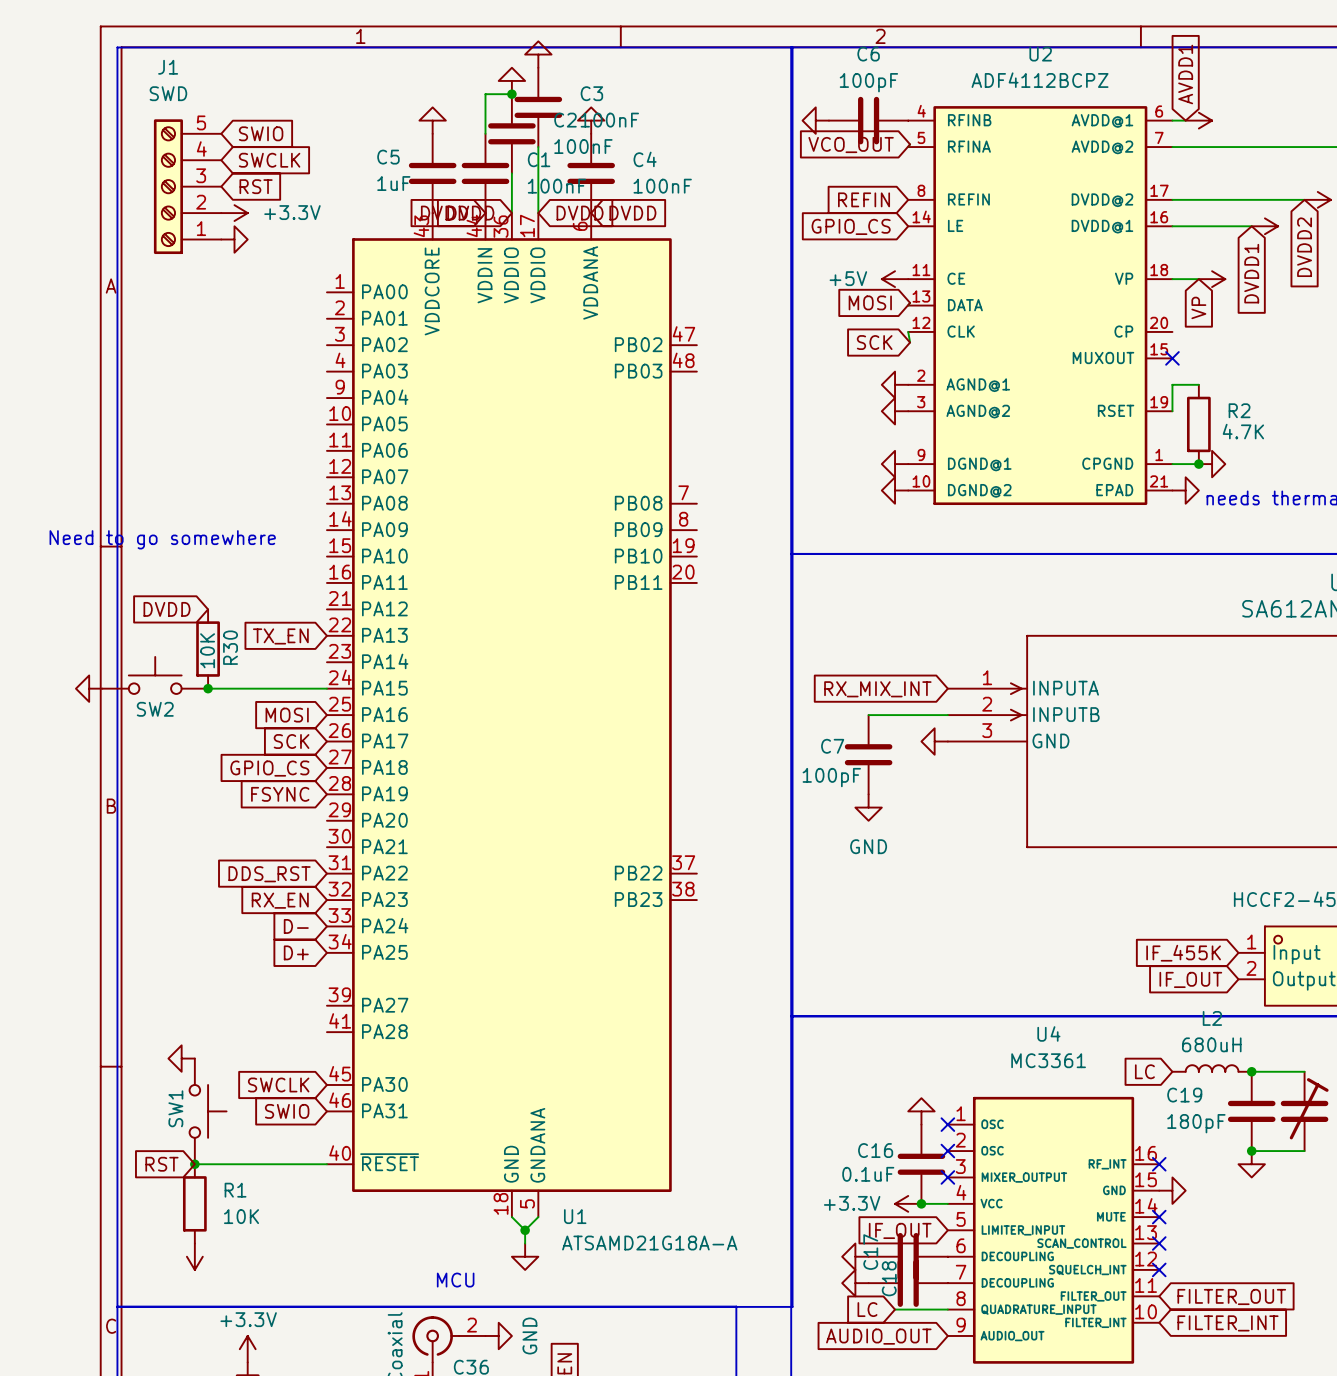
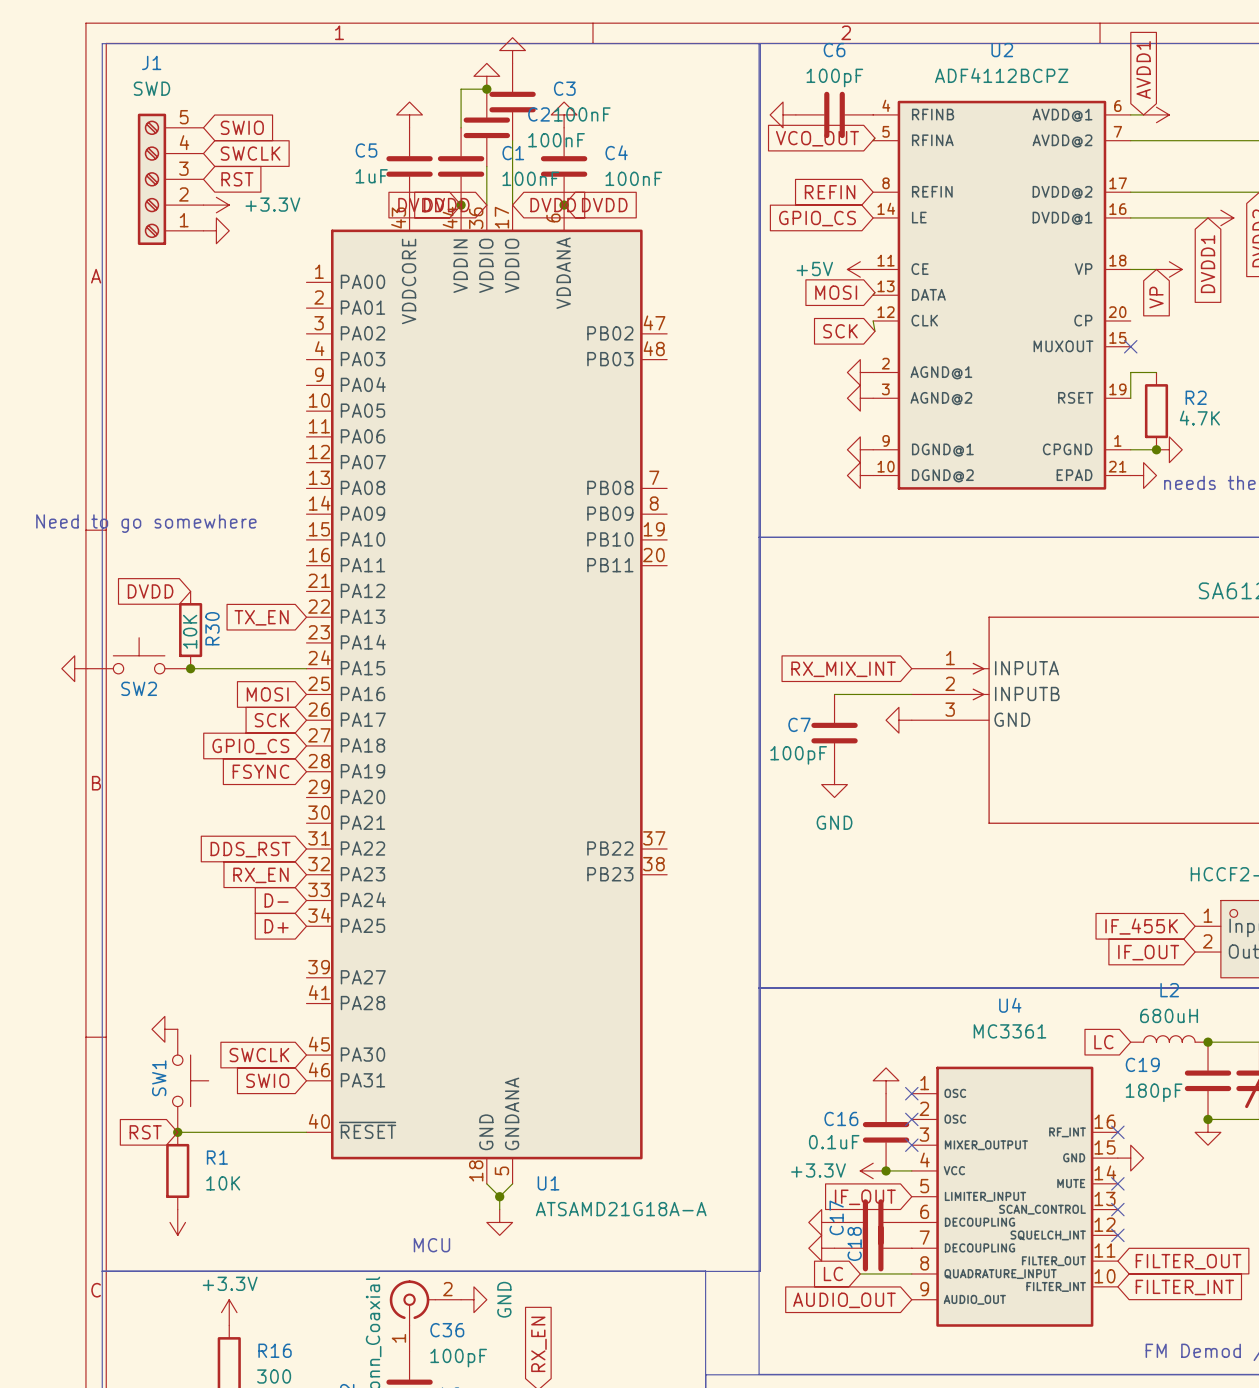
junction: none -> (461, 205)
junction: none -> (564, 205)

